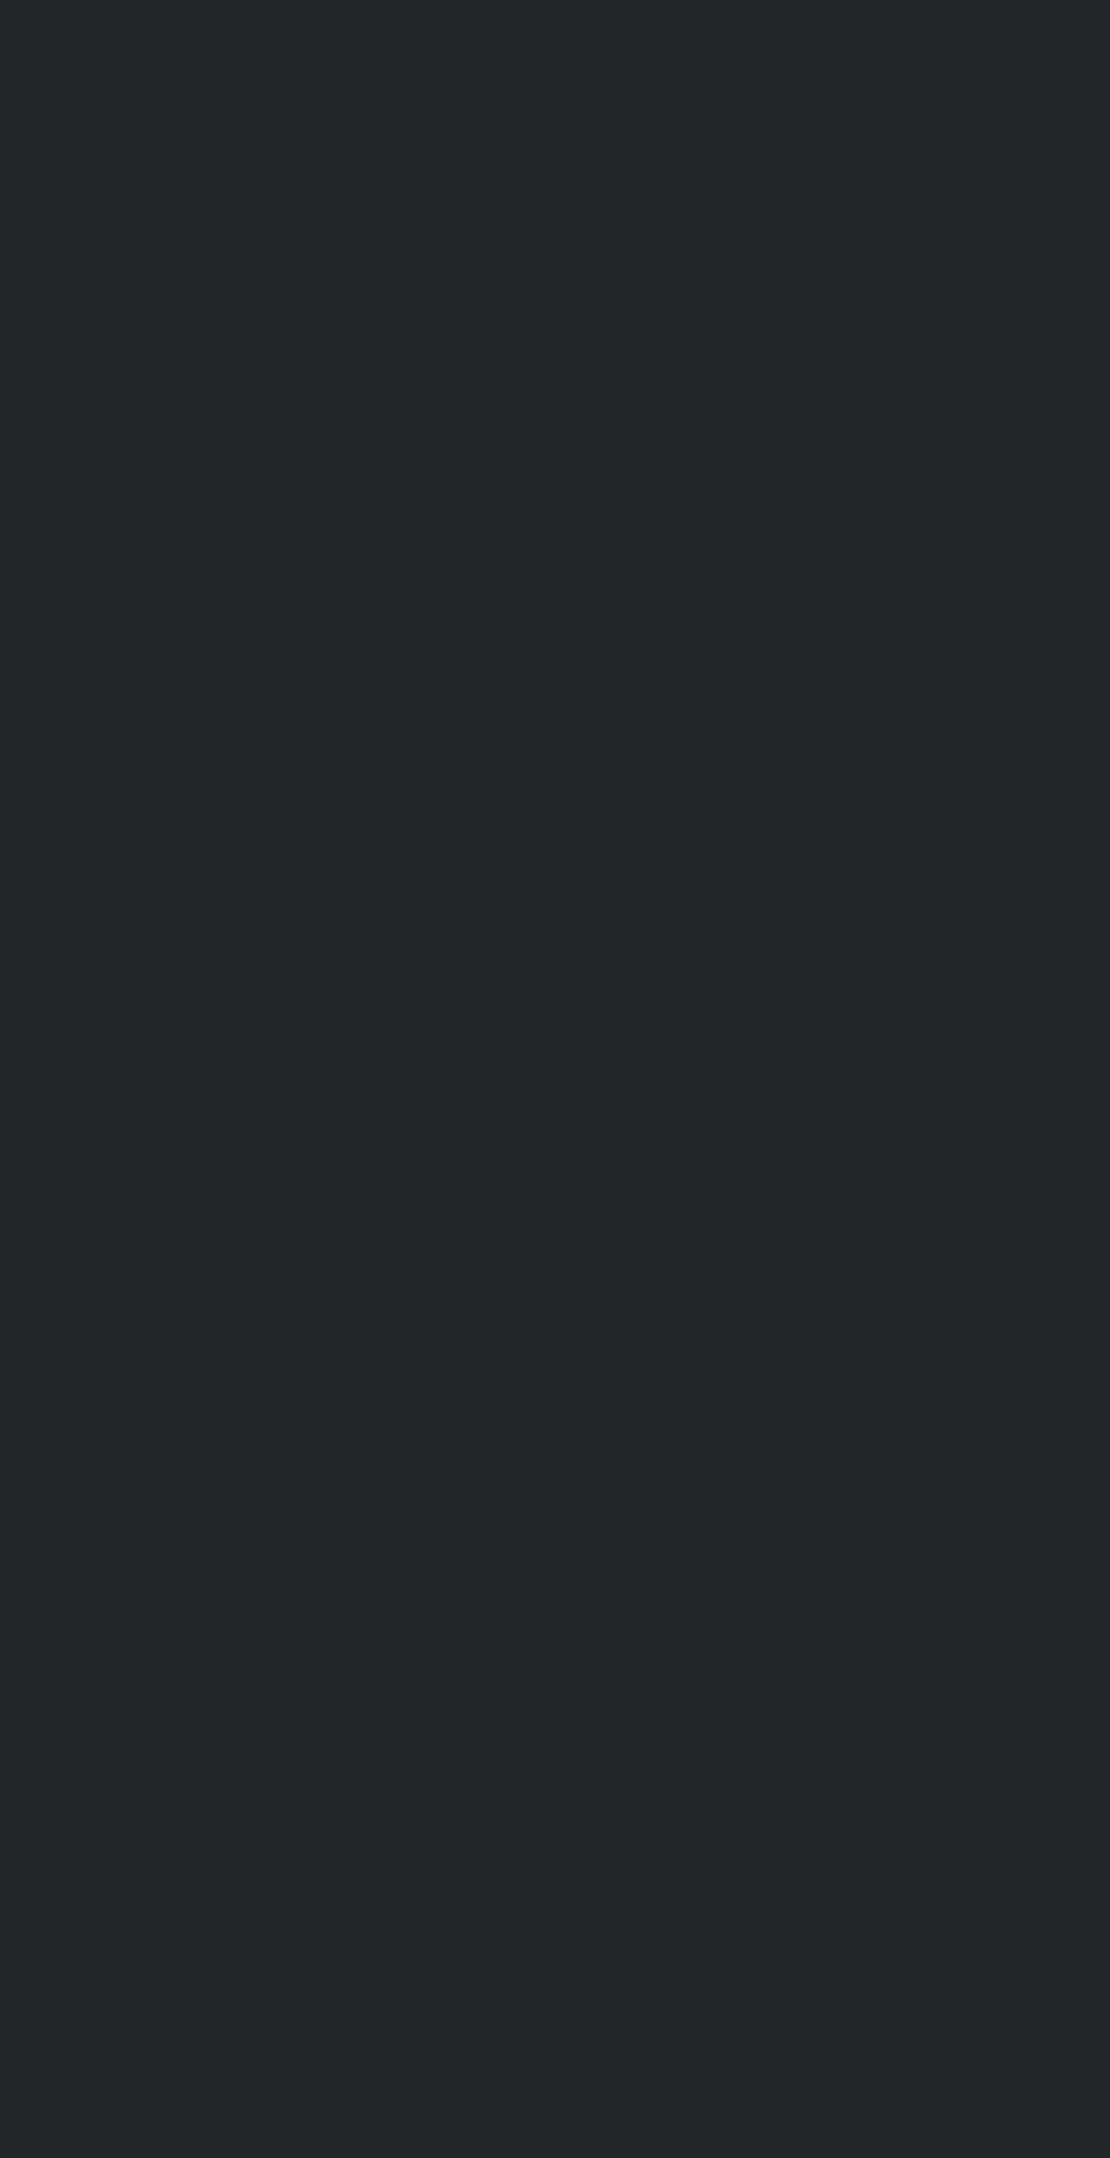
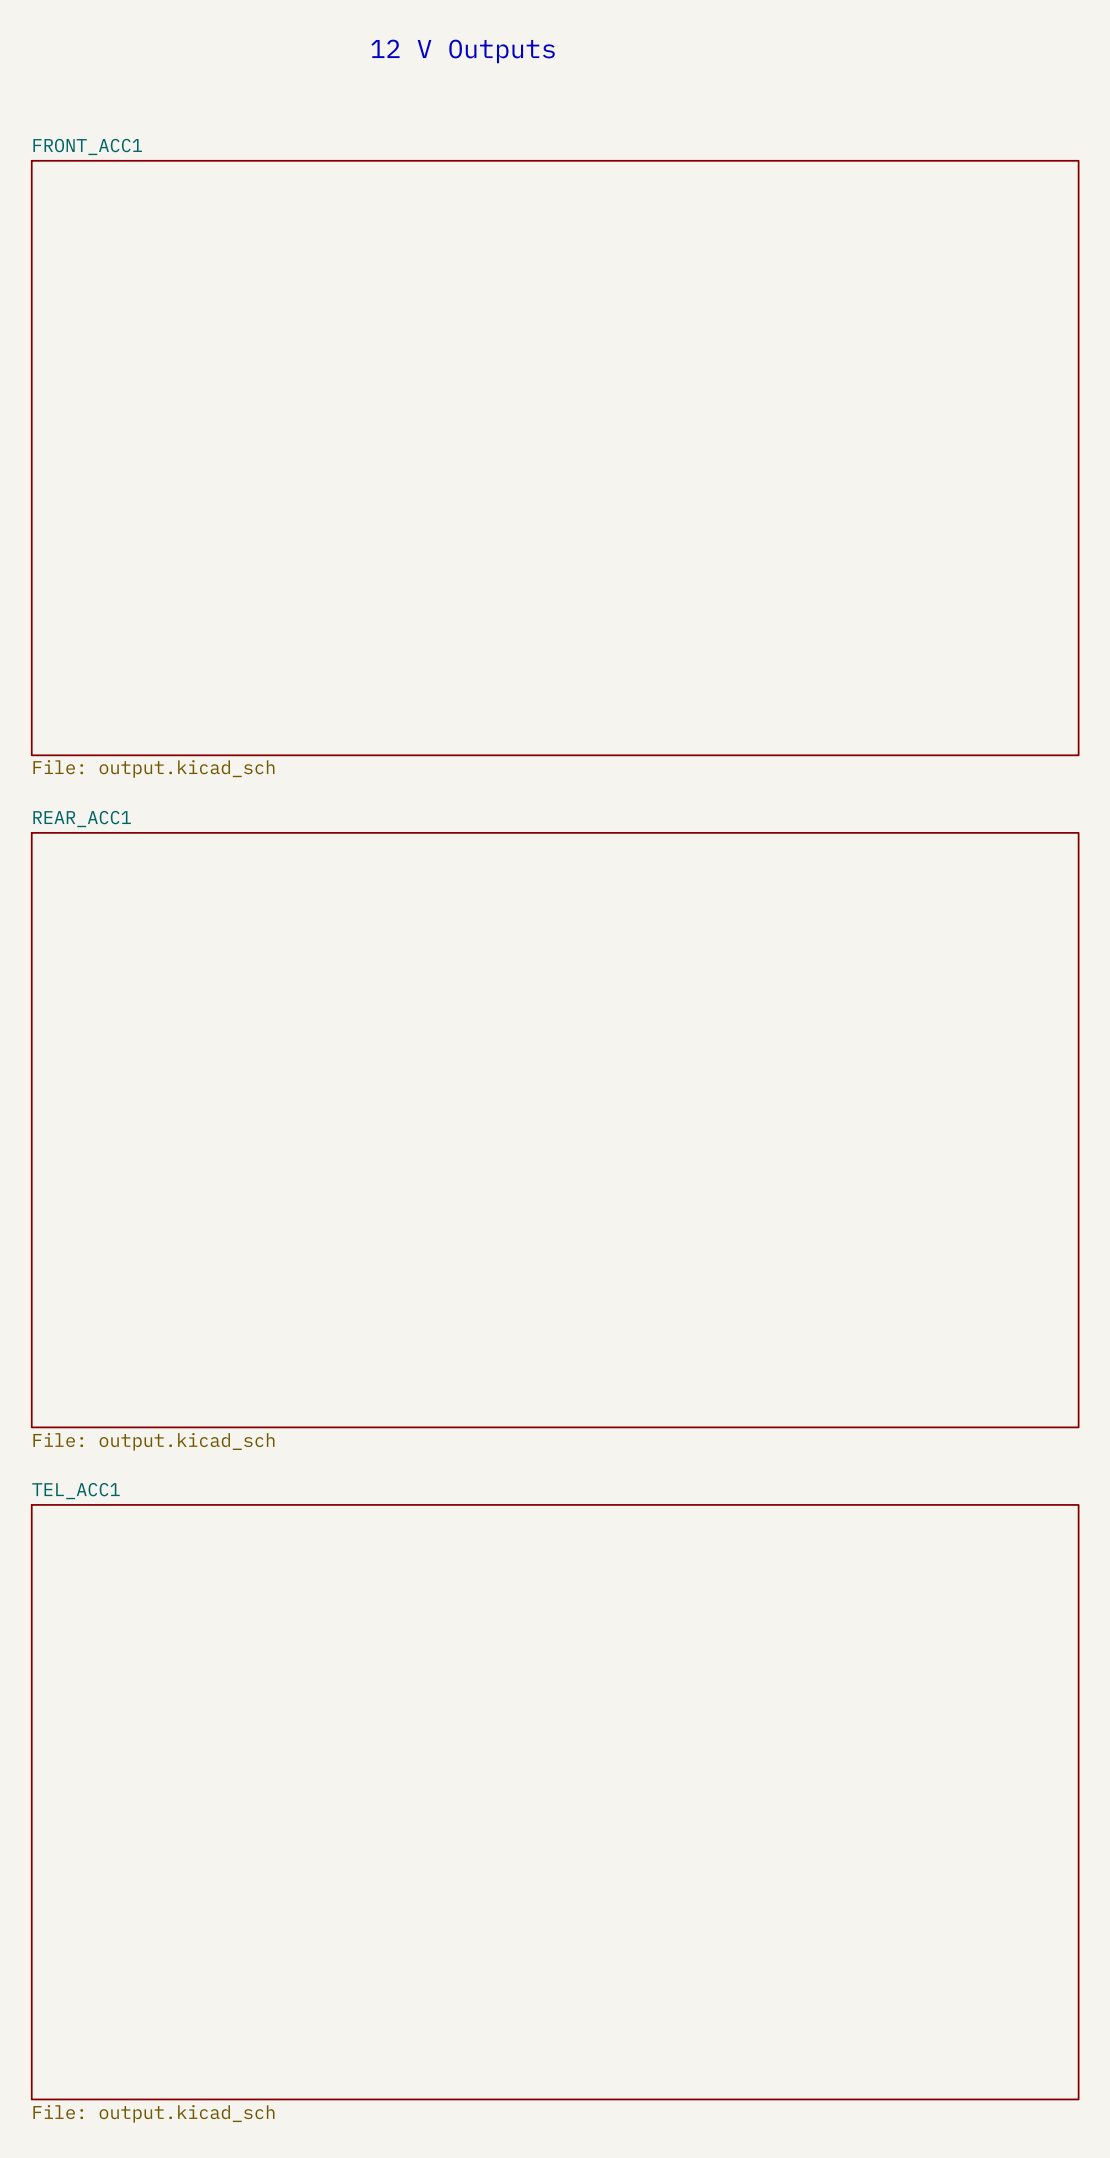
text: none -> 12 V Outputs (463, 51)
sheet FRONT_ACC1: none -> File: output.kicad_sch (555, 458)
sheet REAR_ACC1: none -> File: output.kicad_sch (555, 1130)
sheet TEL_ACC1: none -> File: output.kicad_sch (555, 1802)

